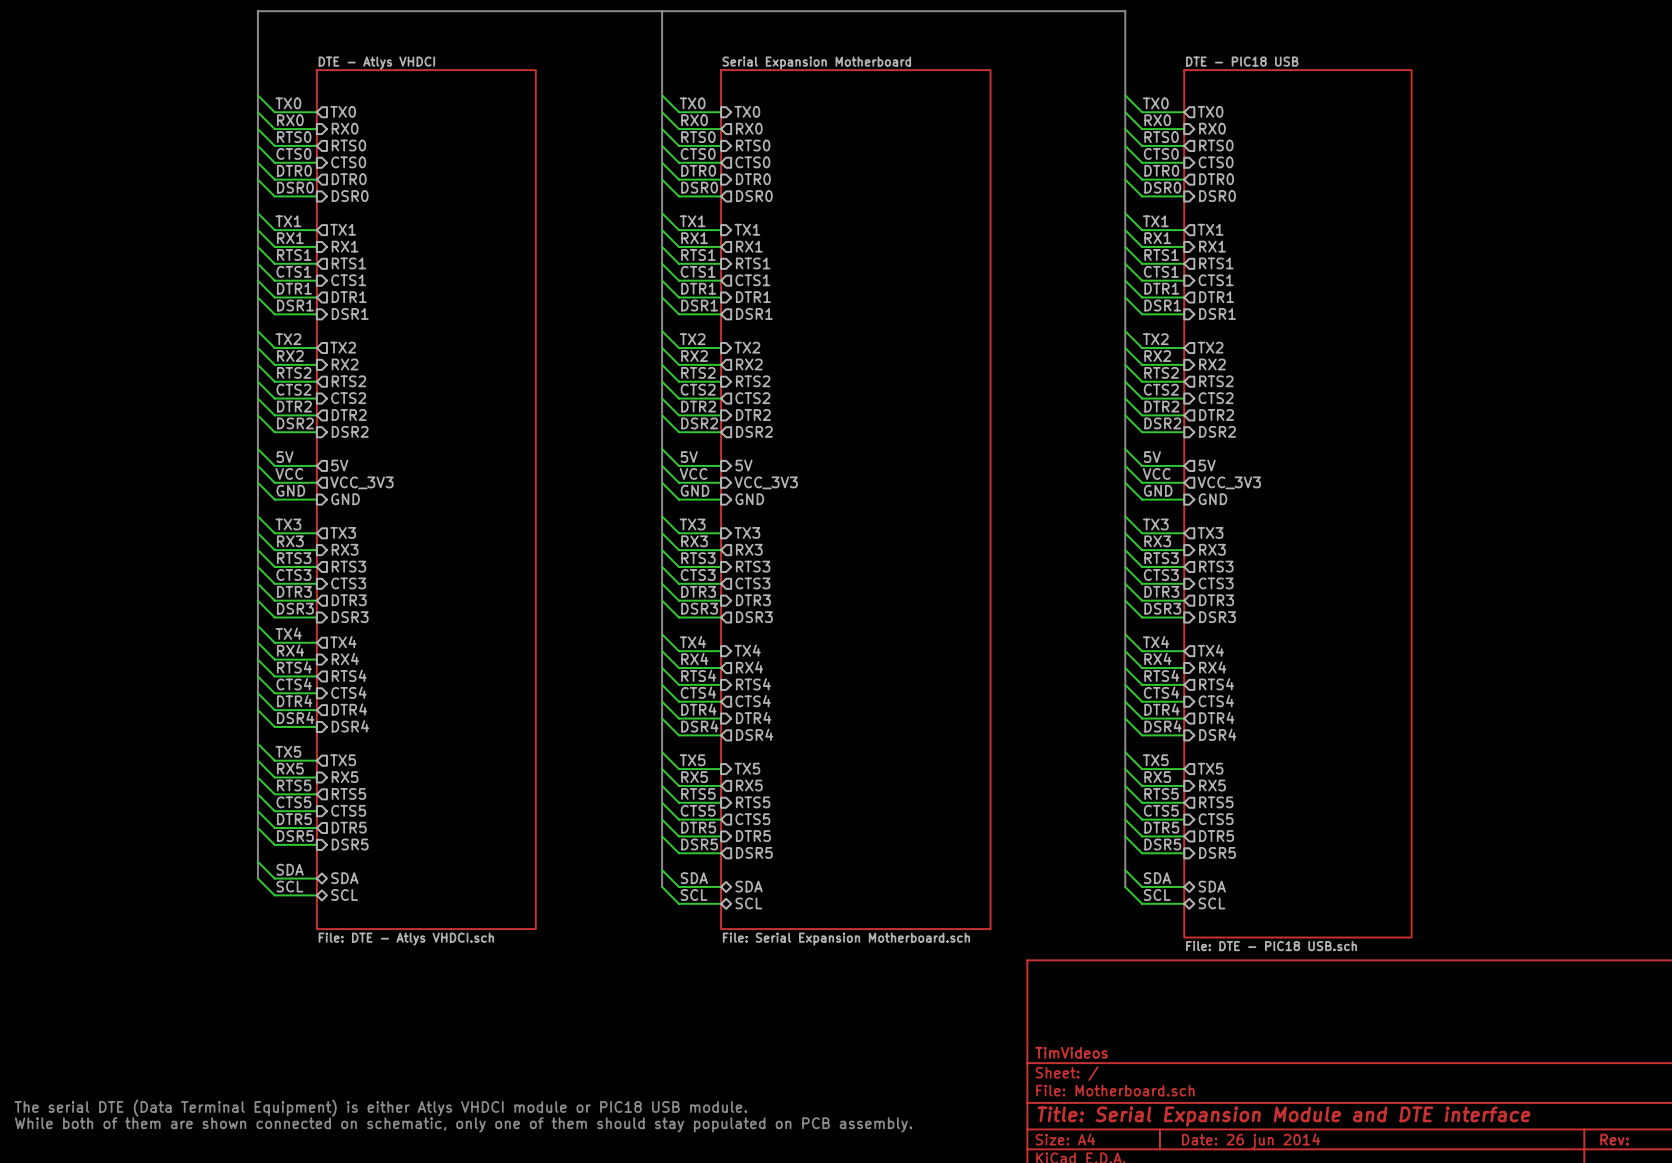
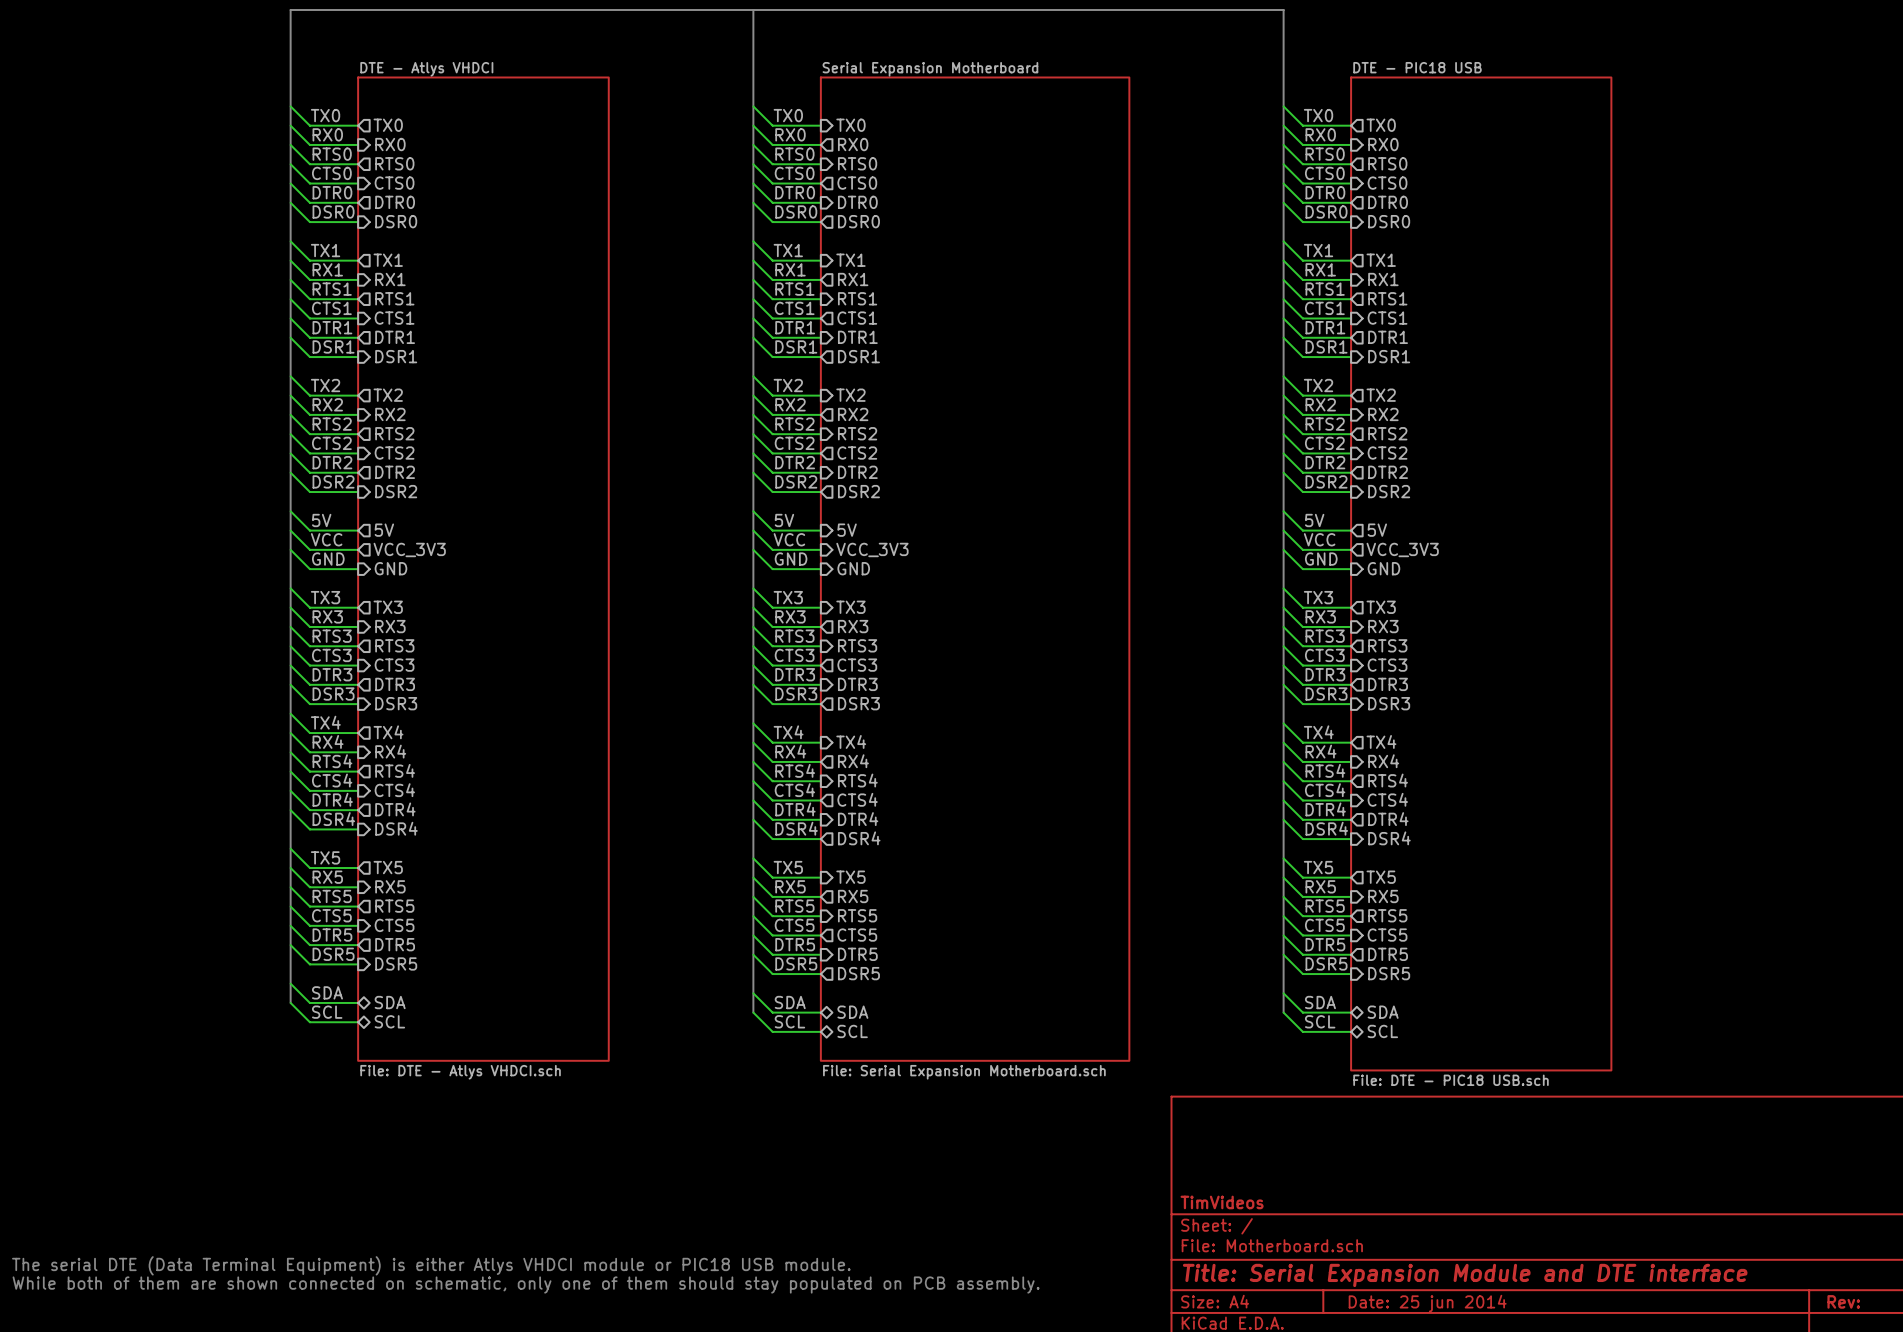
title block: Date: 26 jun 2014 (1251, 1141) -> Date: 25 jun 2014 (1427, 1303)

